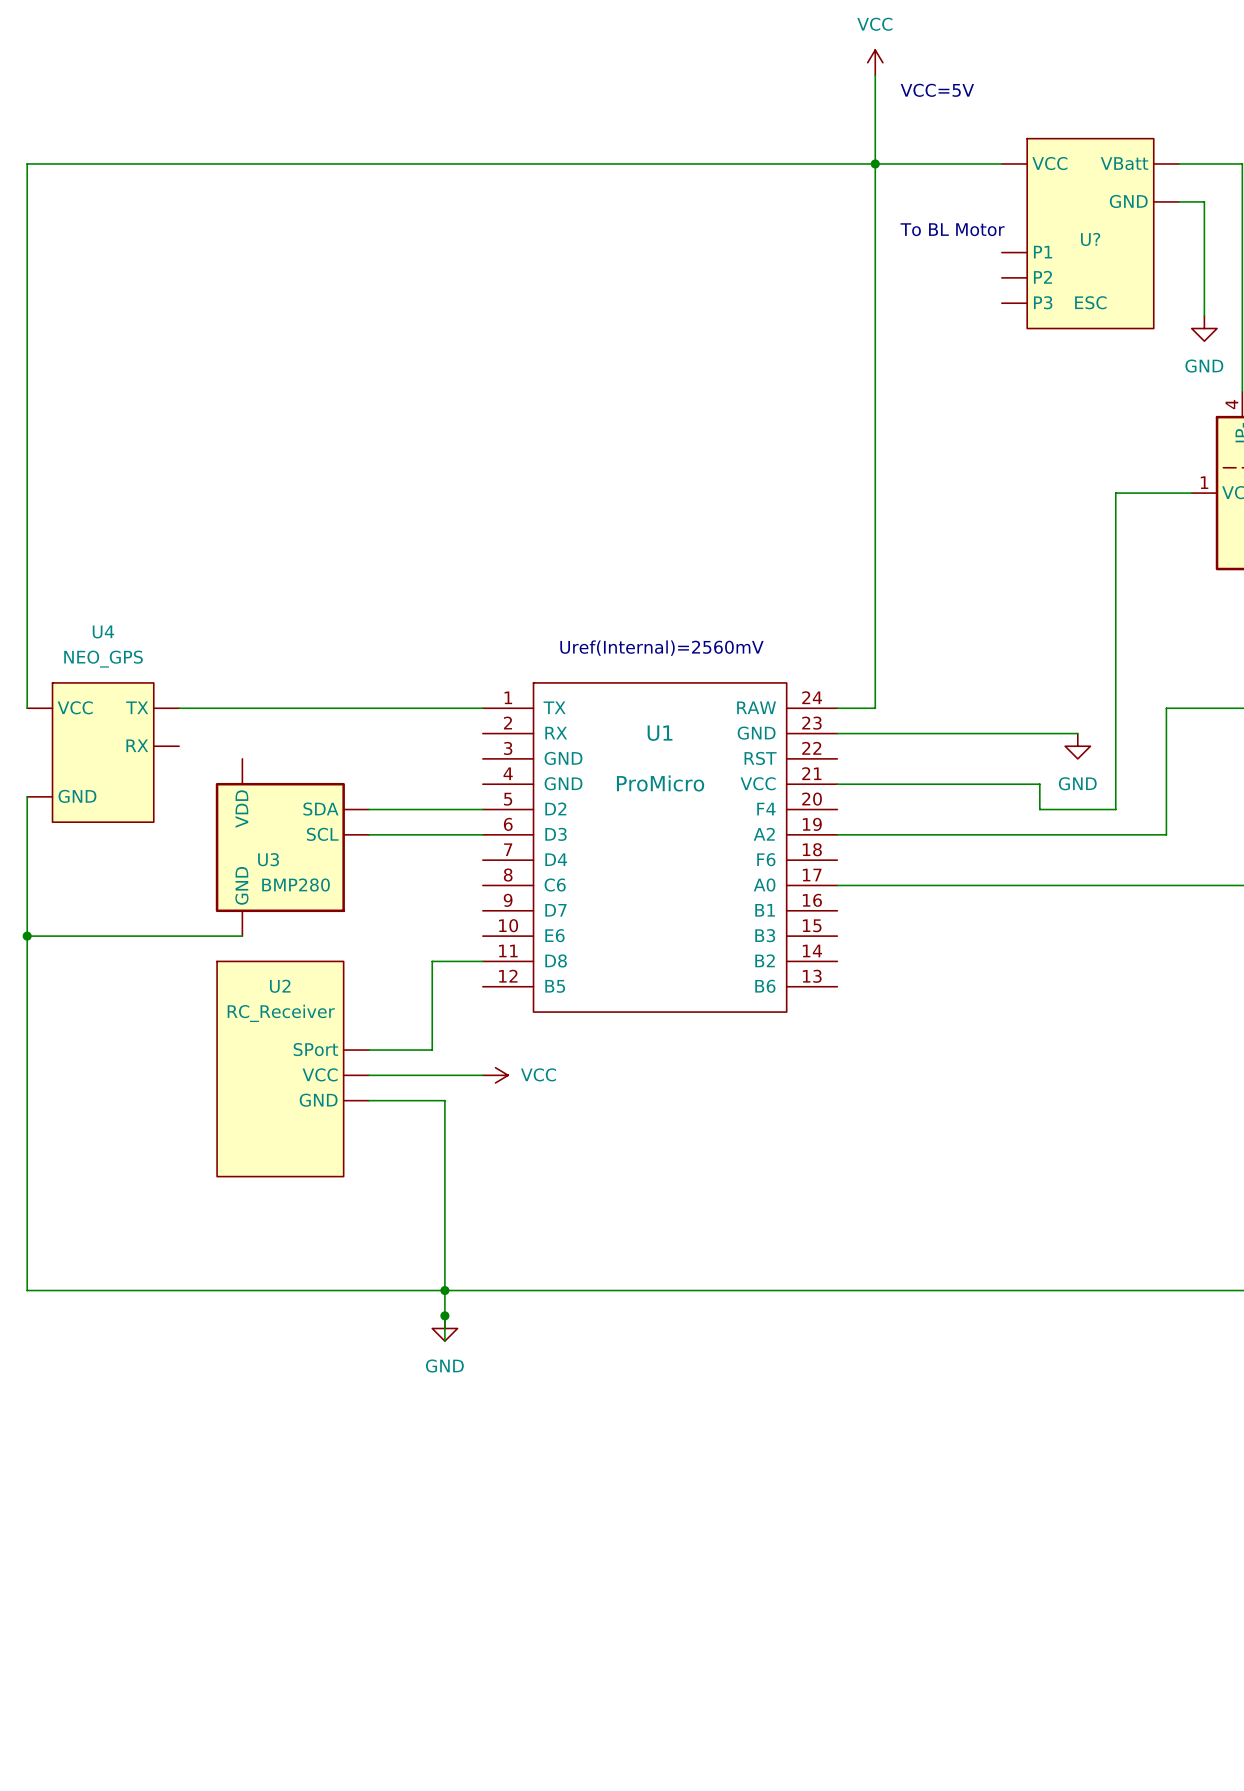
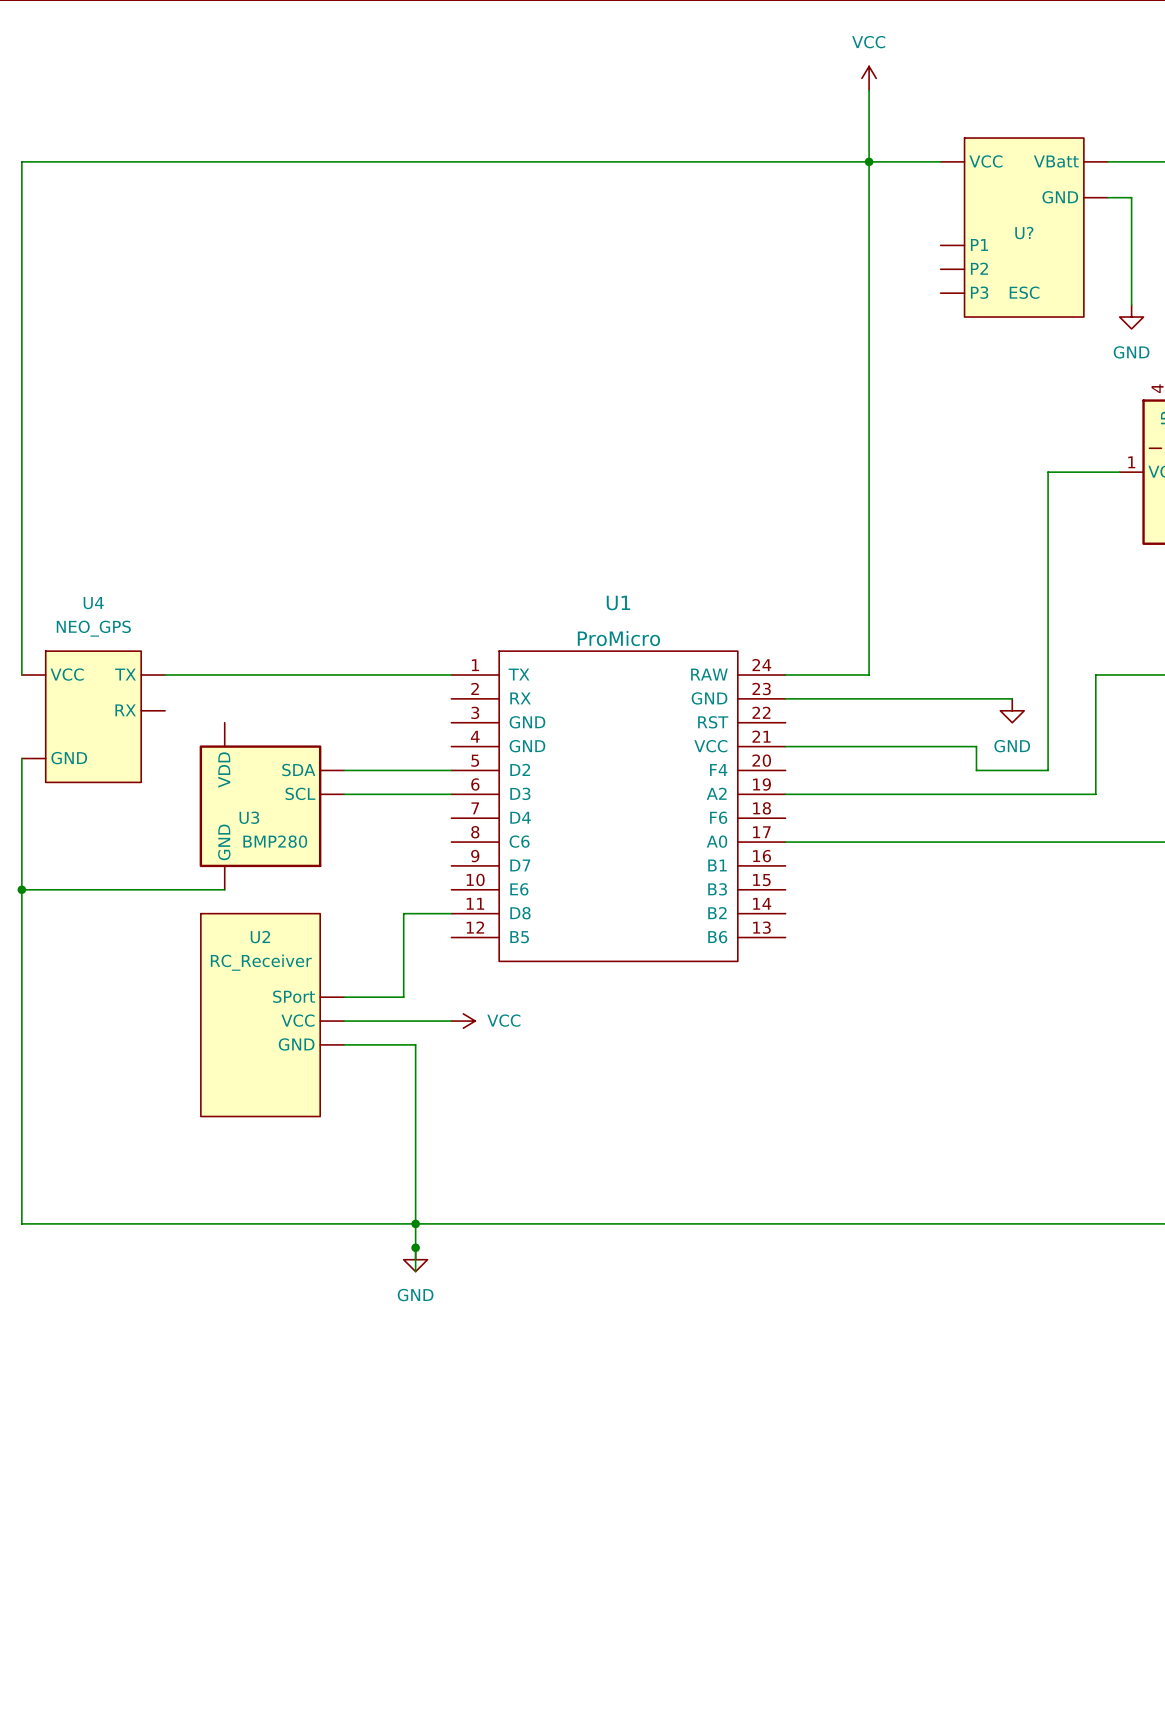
power symbol position: VCC (875, 62) -> VCC (869, 78)
wire: (875, 75) (875, 708) -> (869, 90) (869, 675) (821, 675)
text: VCC=5V (937, 90) -> none
junction position: (875, 163) -> (869, 161)
text: To BL Motor (952, 229) -> none
text: Uref(Internal)=2560mV (661, 648) -> none
U1 name position: U1 (660, 733) -> U1 (618, 603)
U1 value position: ProMicro (660, 783) -> ProMicro (618, 638)

